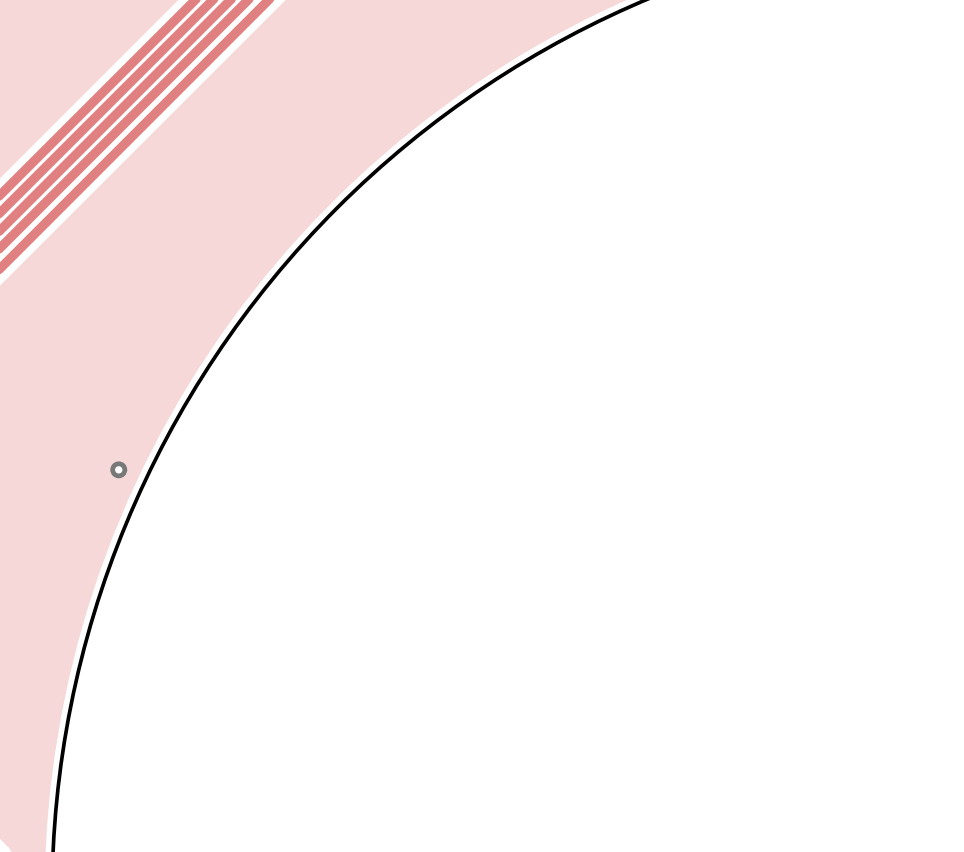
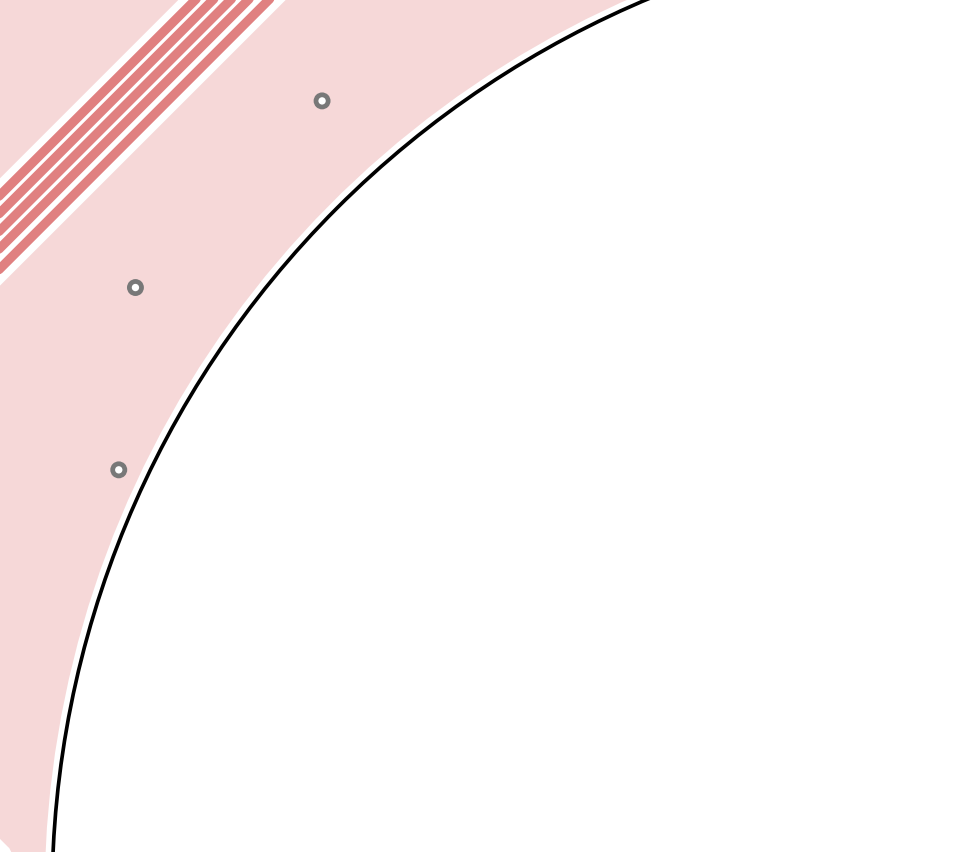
via: none -> (322, 100)
via: none -> (135, 287)

